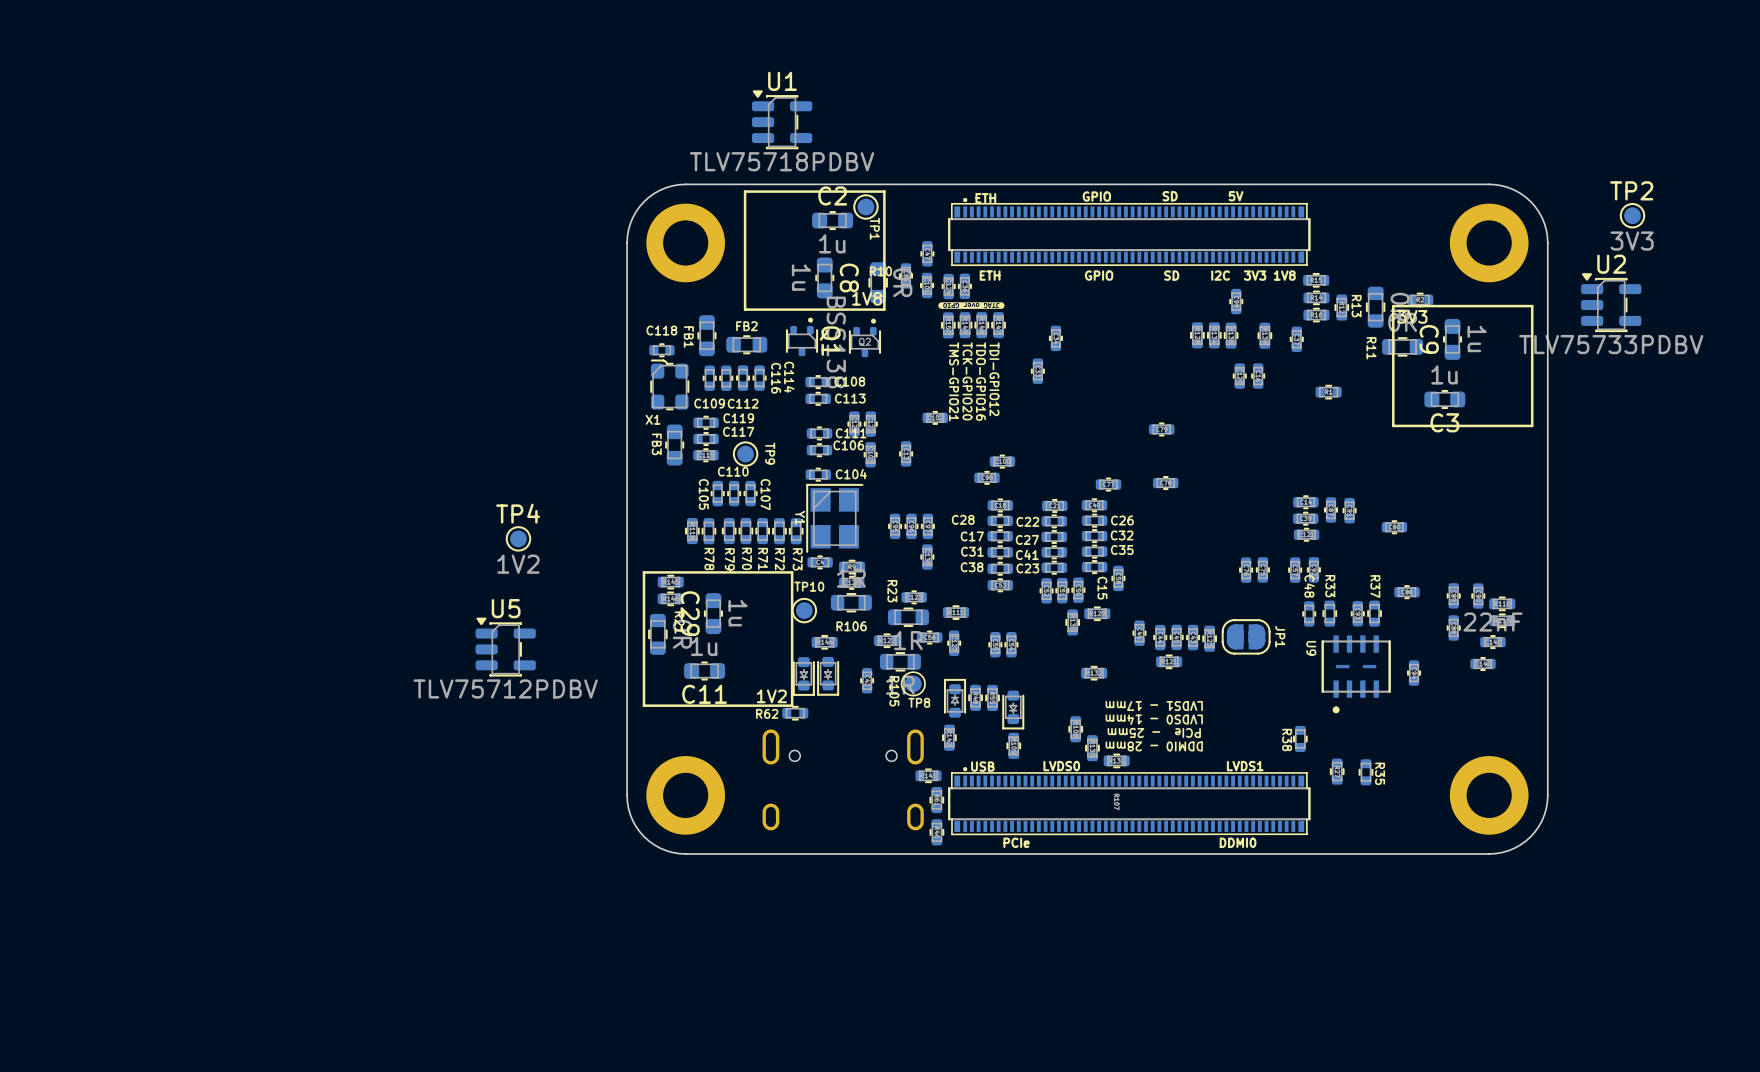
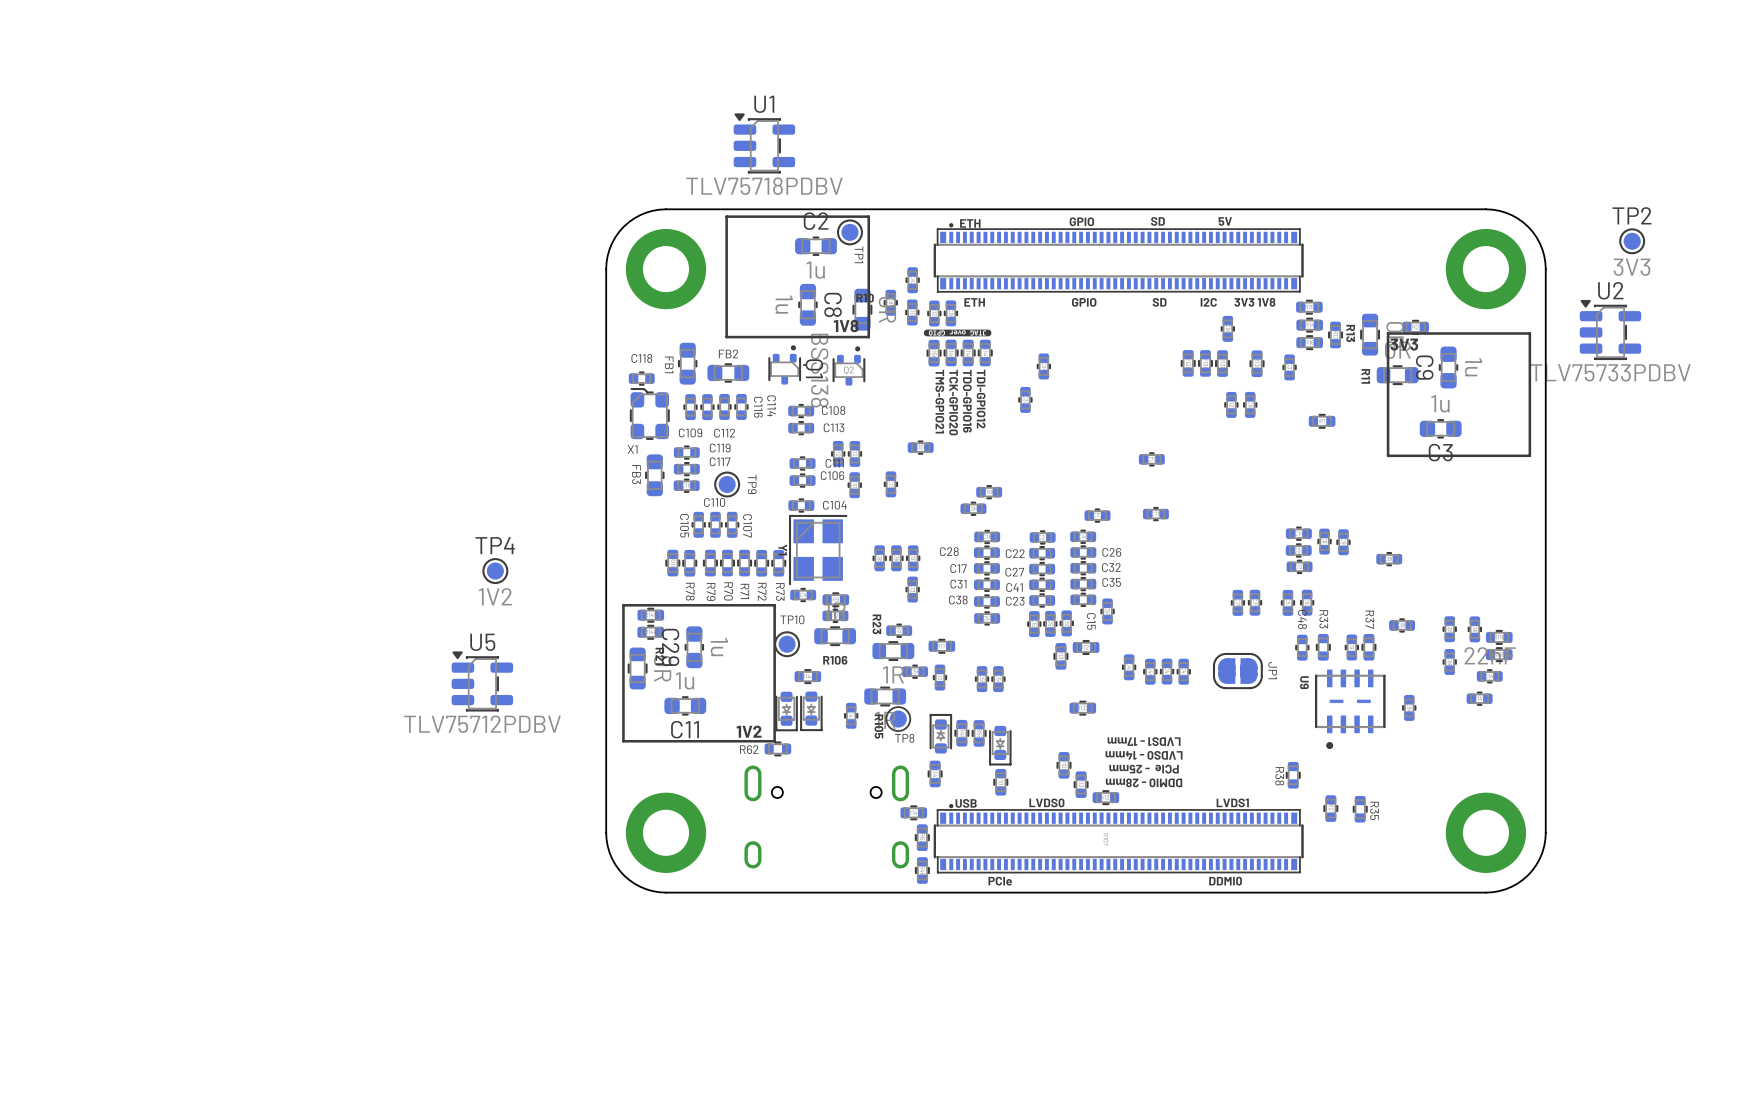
part: (1209, 638) -> none
part: (887, 640) -> none
part: (1169, 661) -> none

